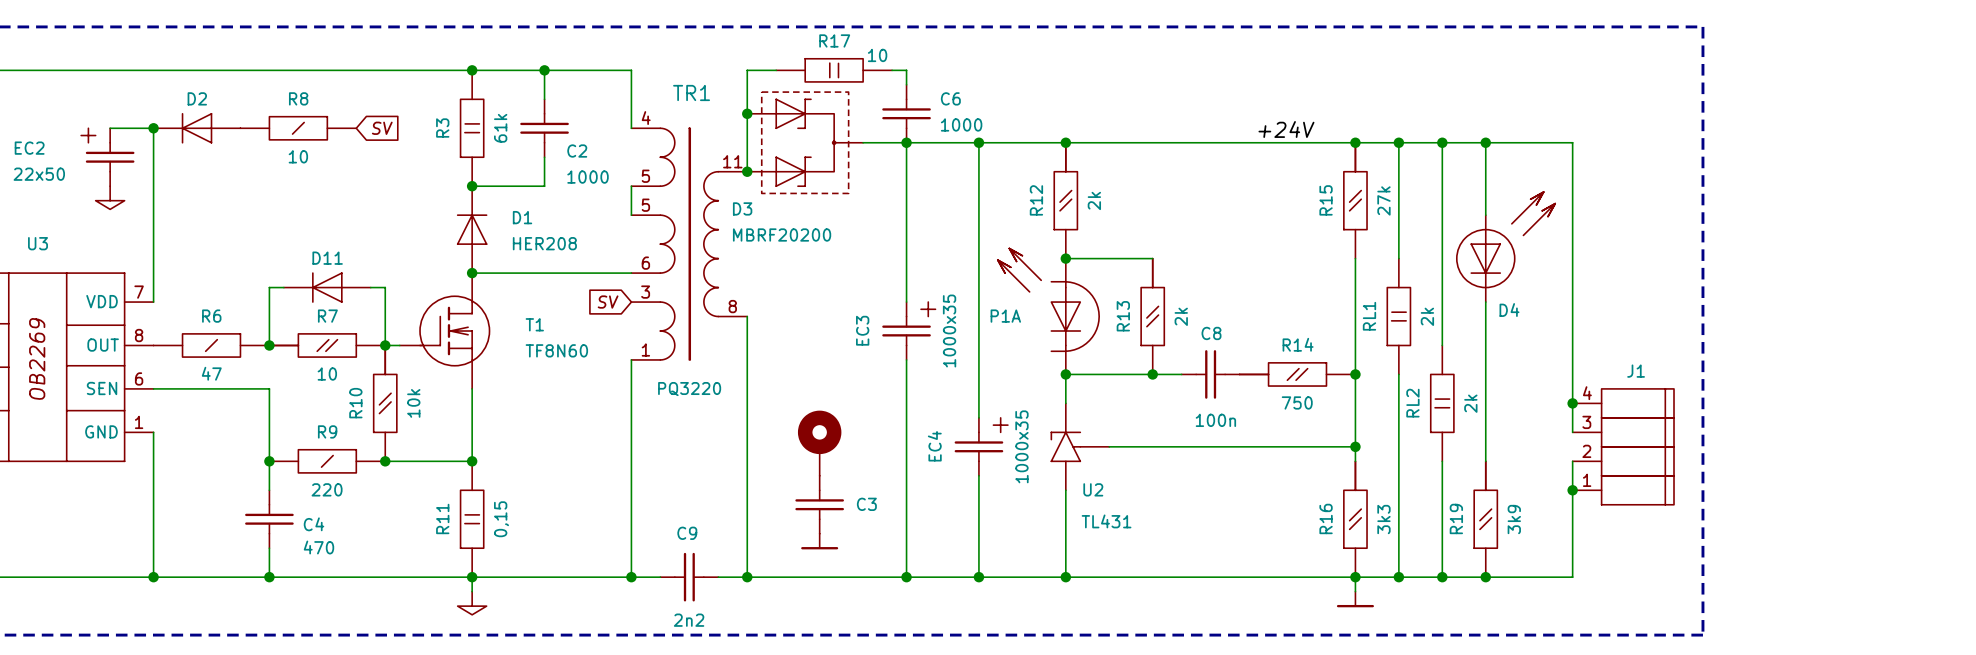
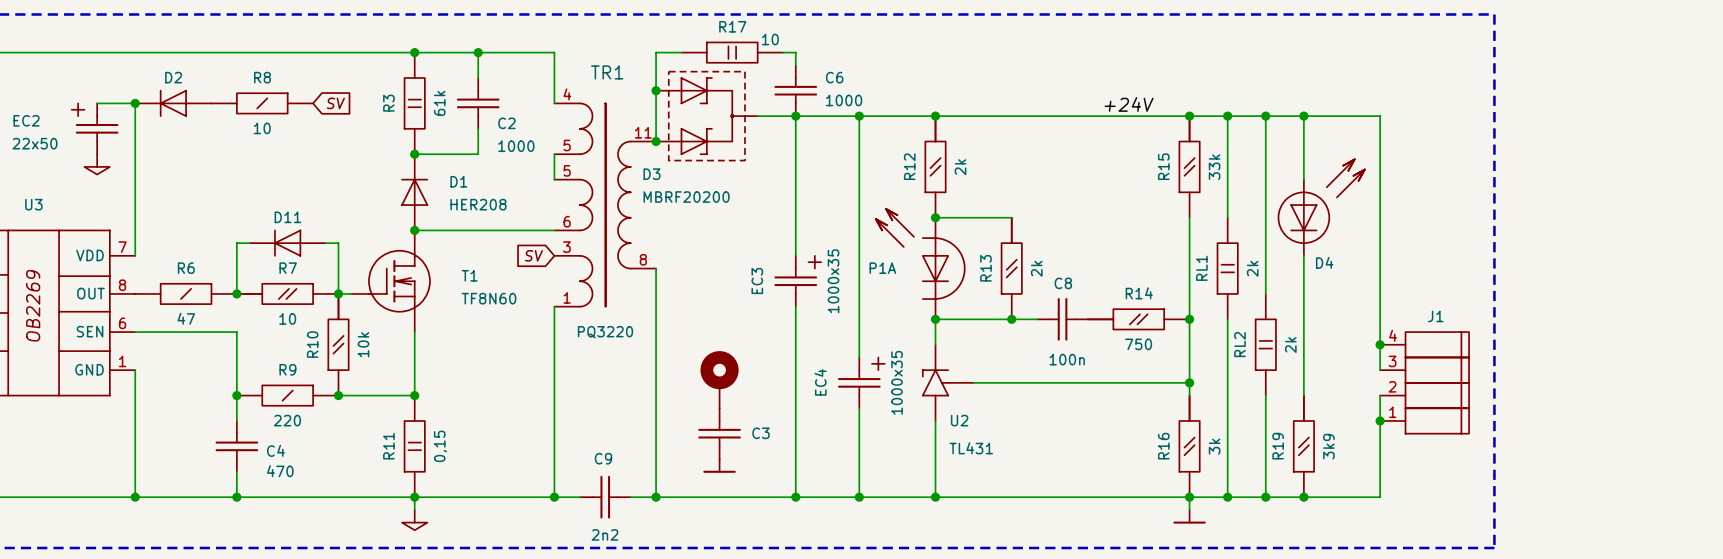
R15 value: 27k (1383, 200) -> 33k (1214, 167)
R16 value: 3k3 (1383, 519) -> 3k (1214, 446)

